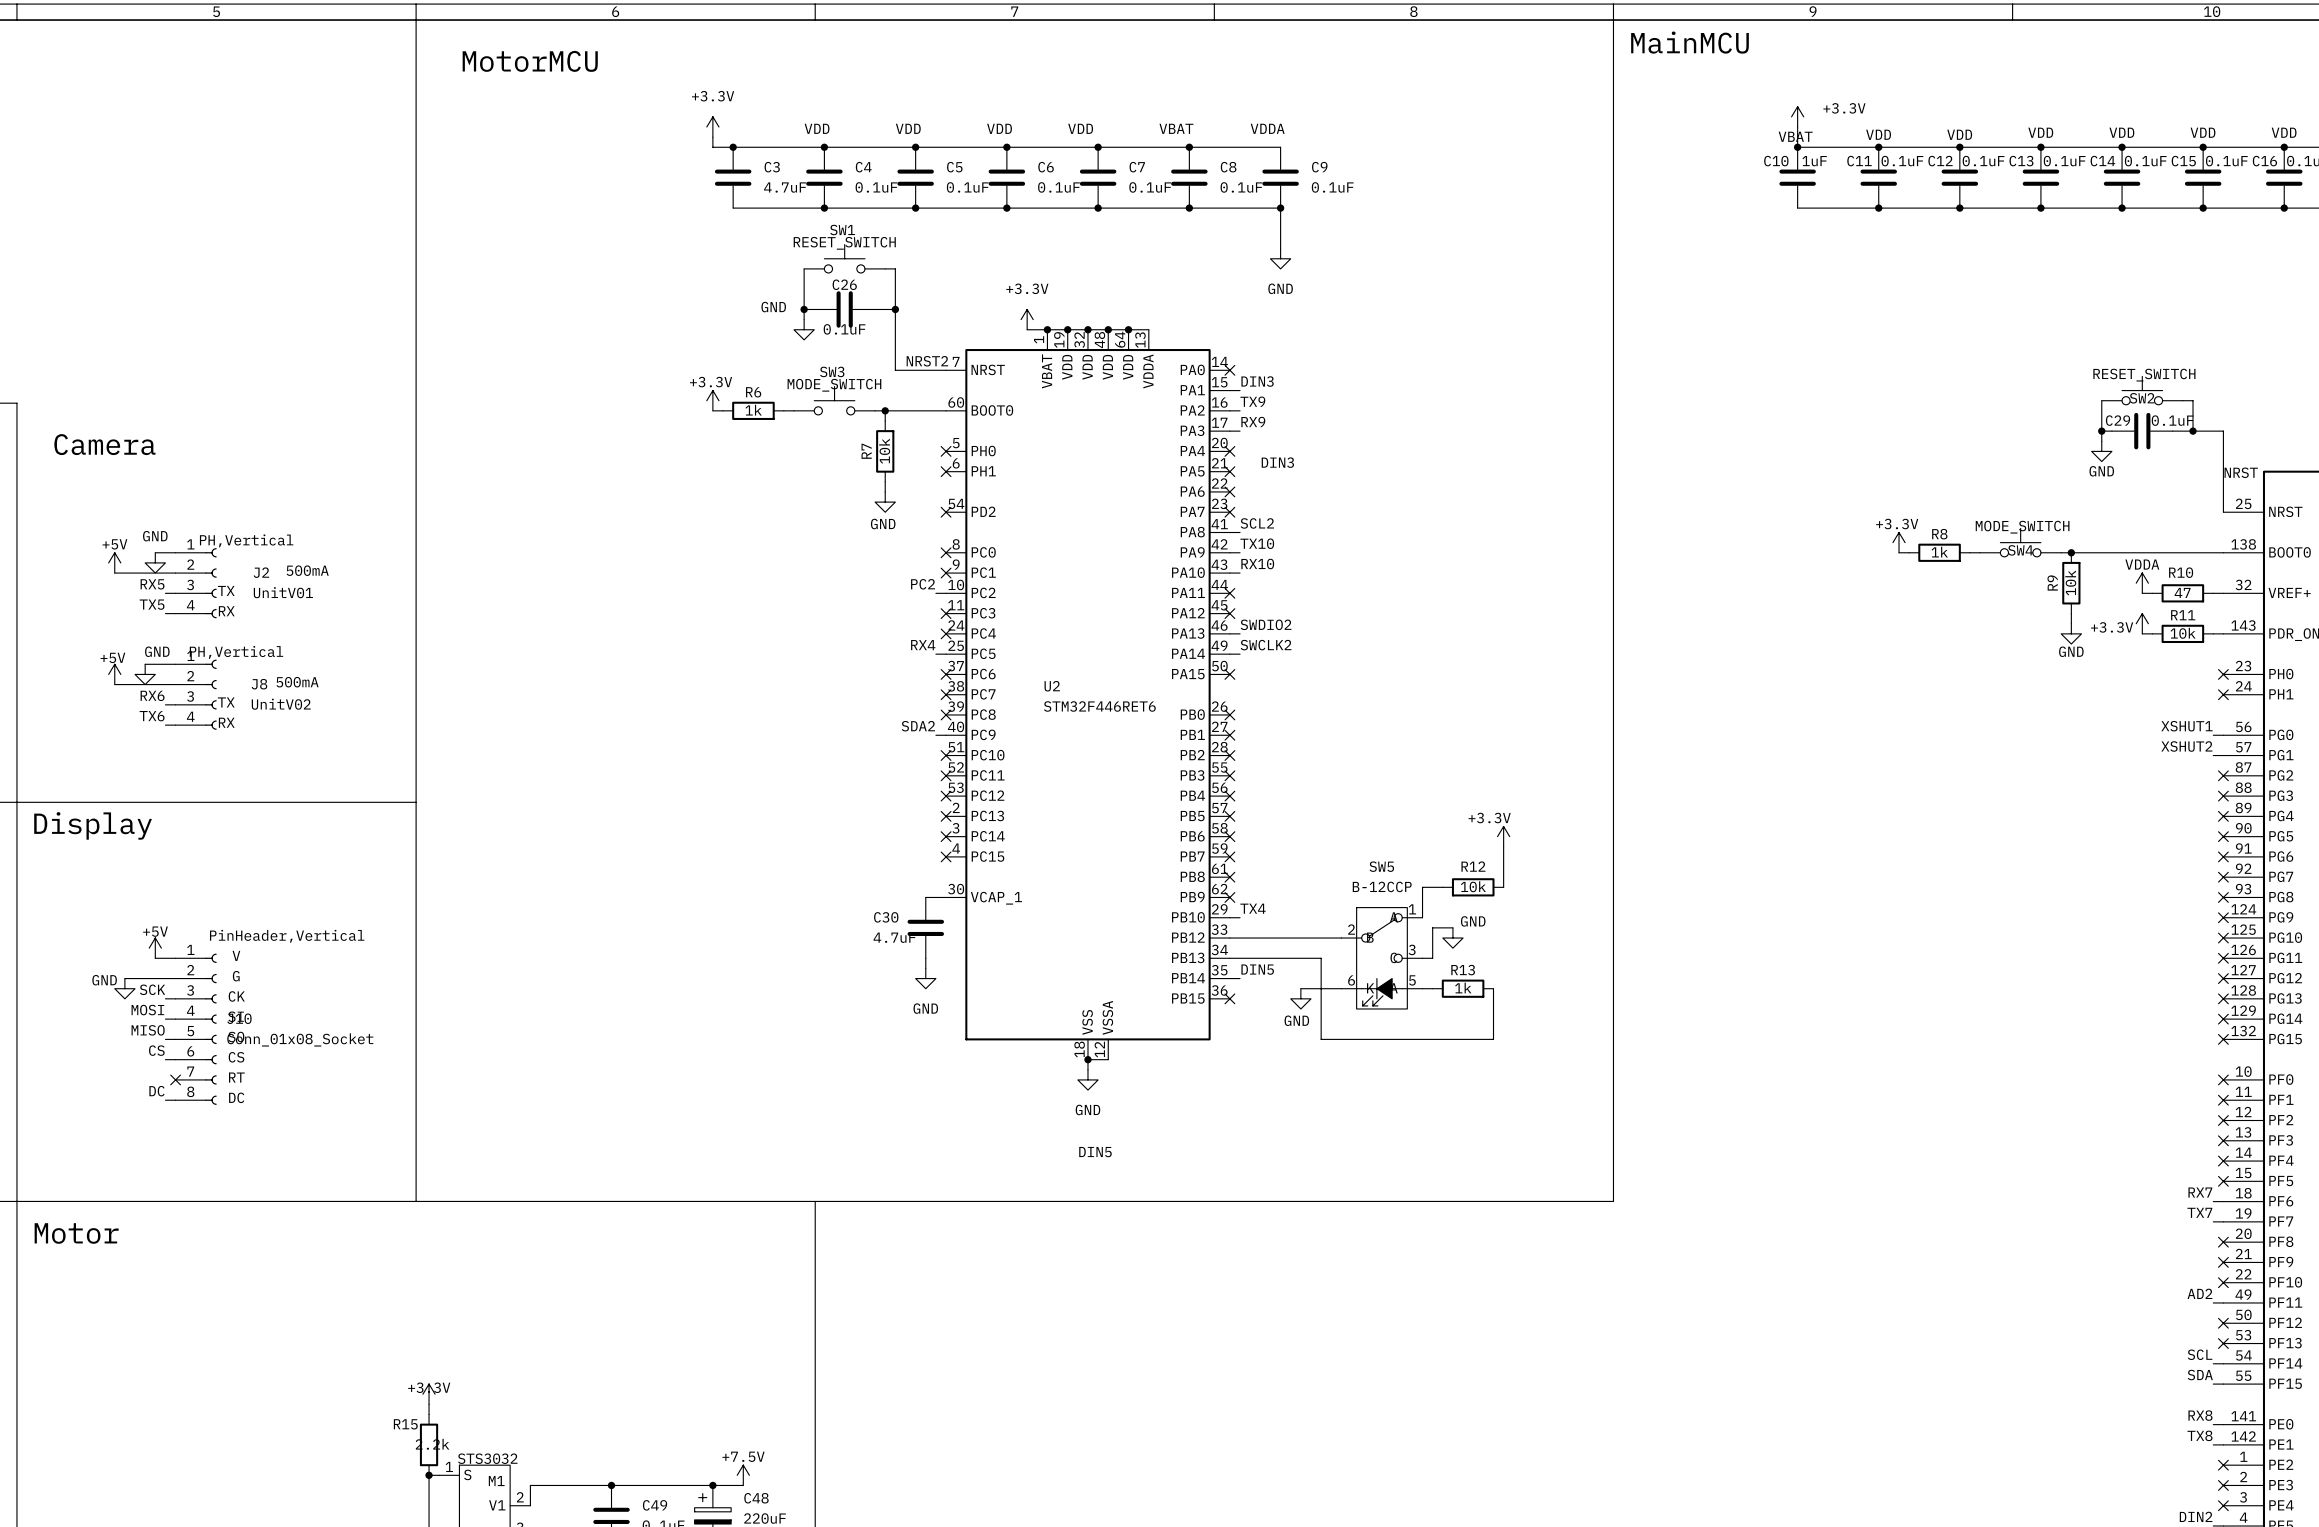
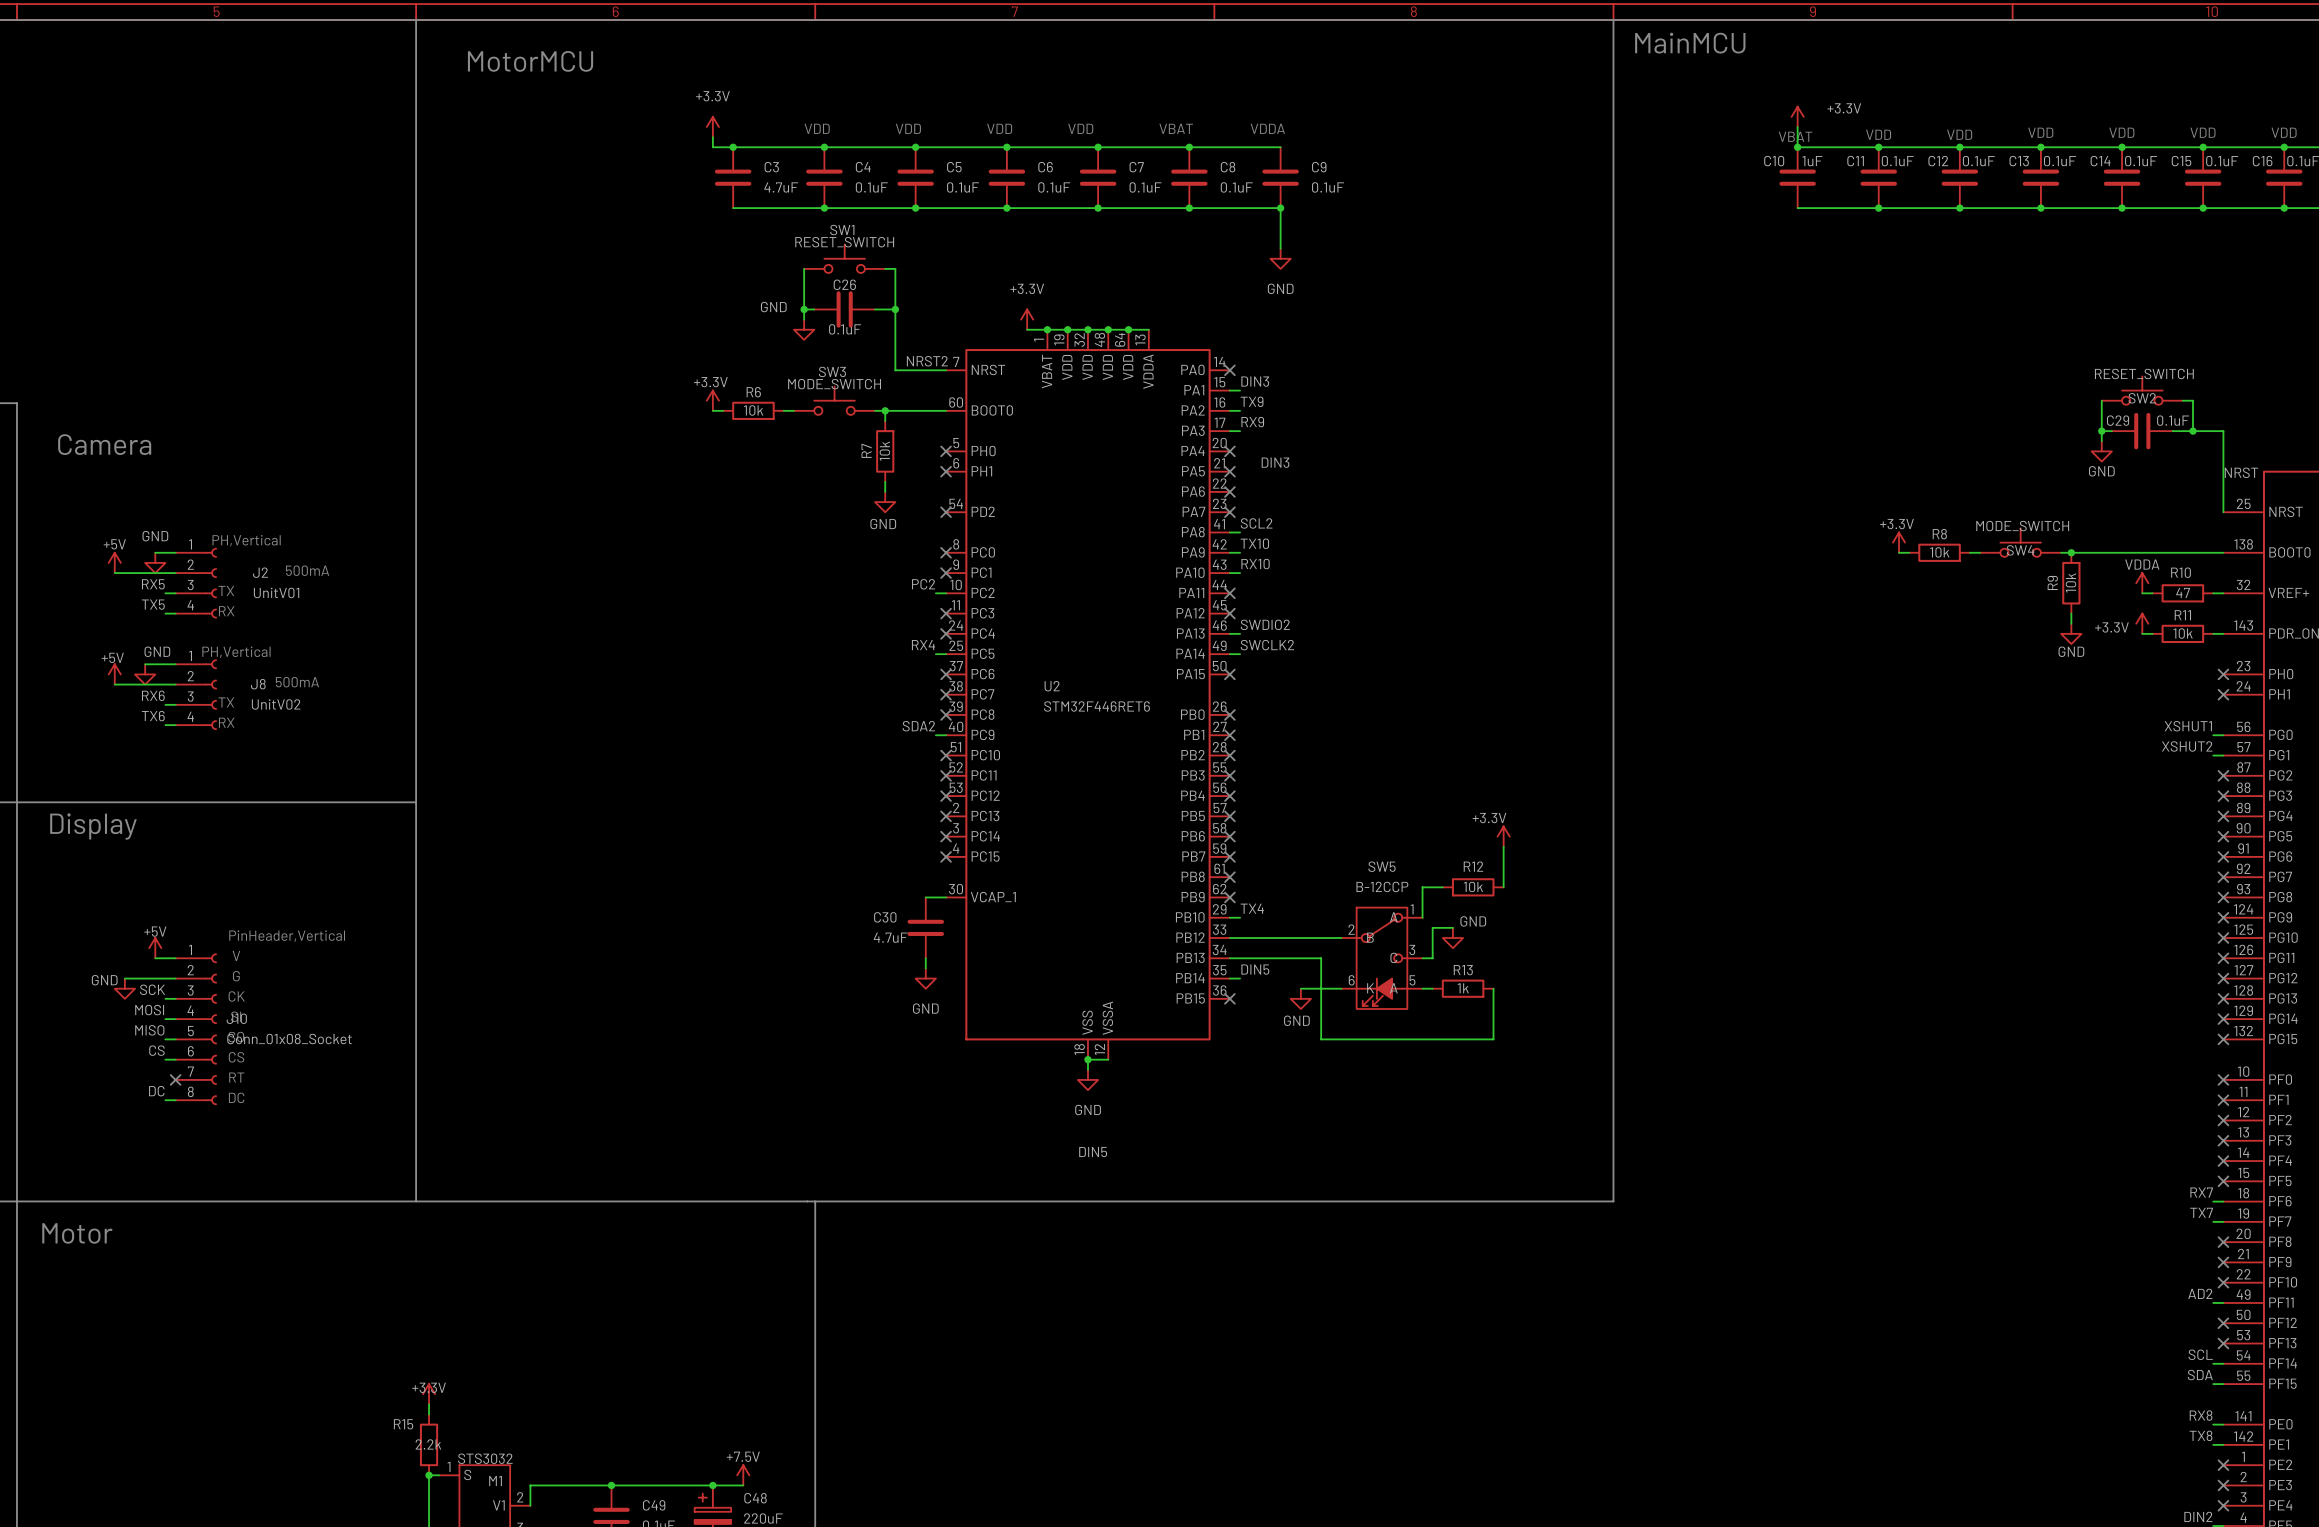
R6 value: 1k (753, 410) -> 10k (753, 410)
R8 value: 1k (1939, 552) -> 10k (1939, 552)

